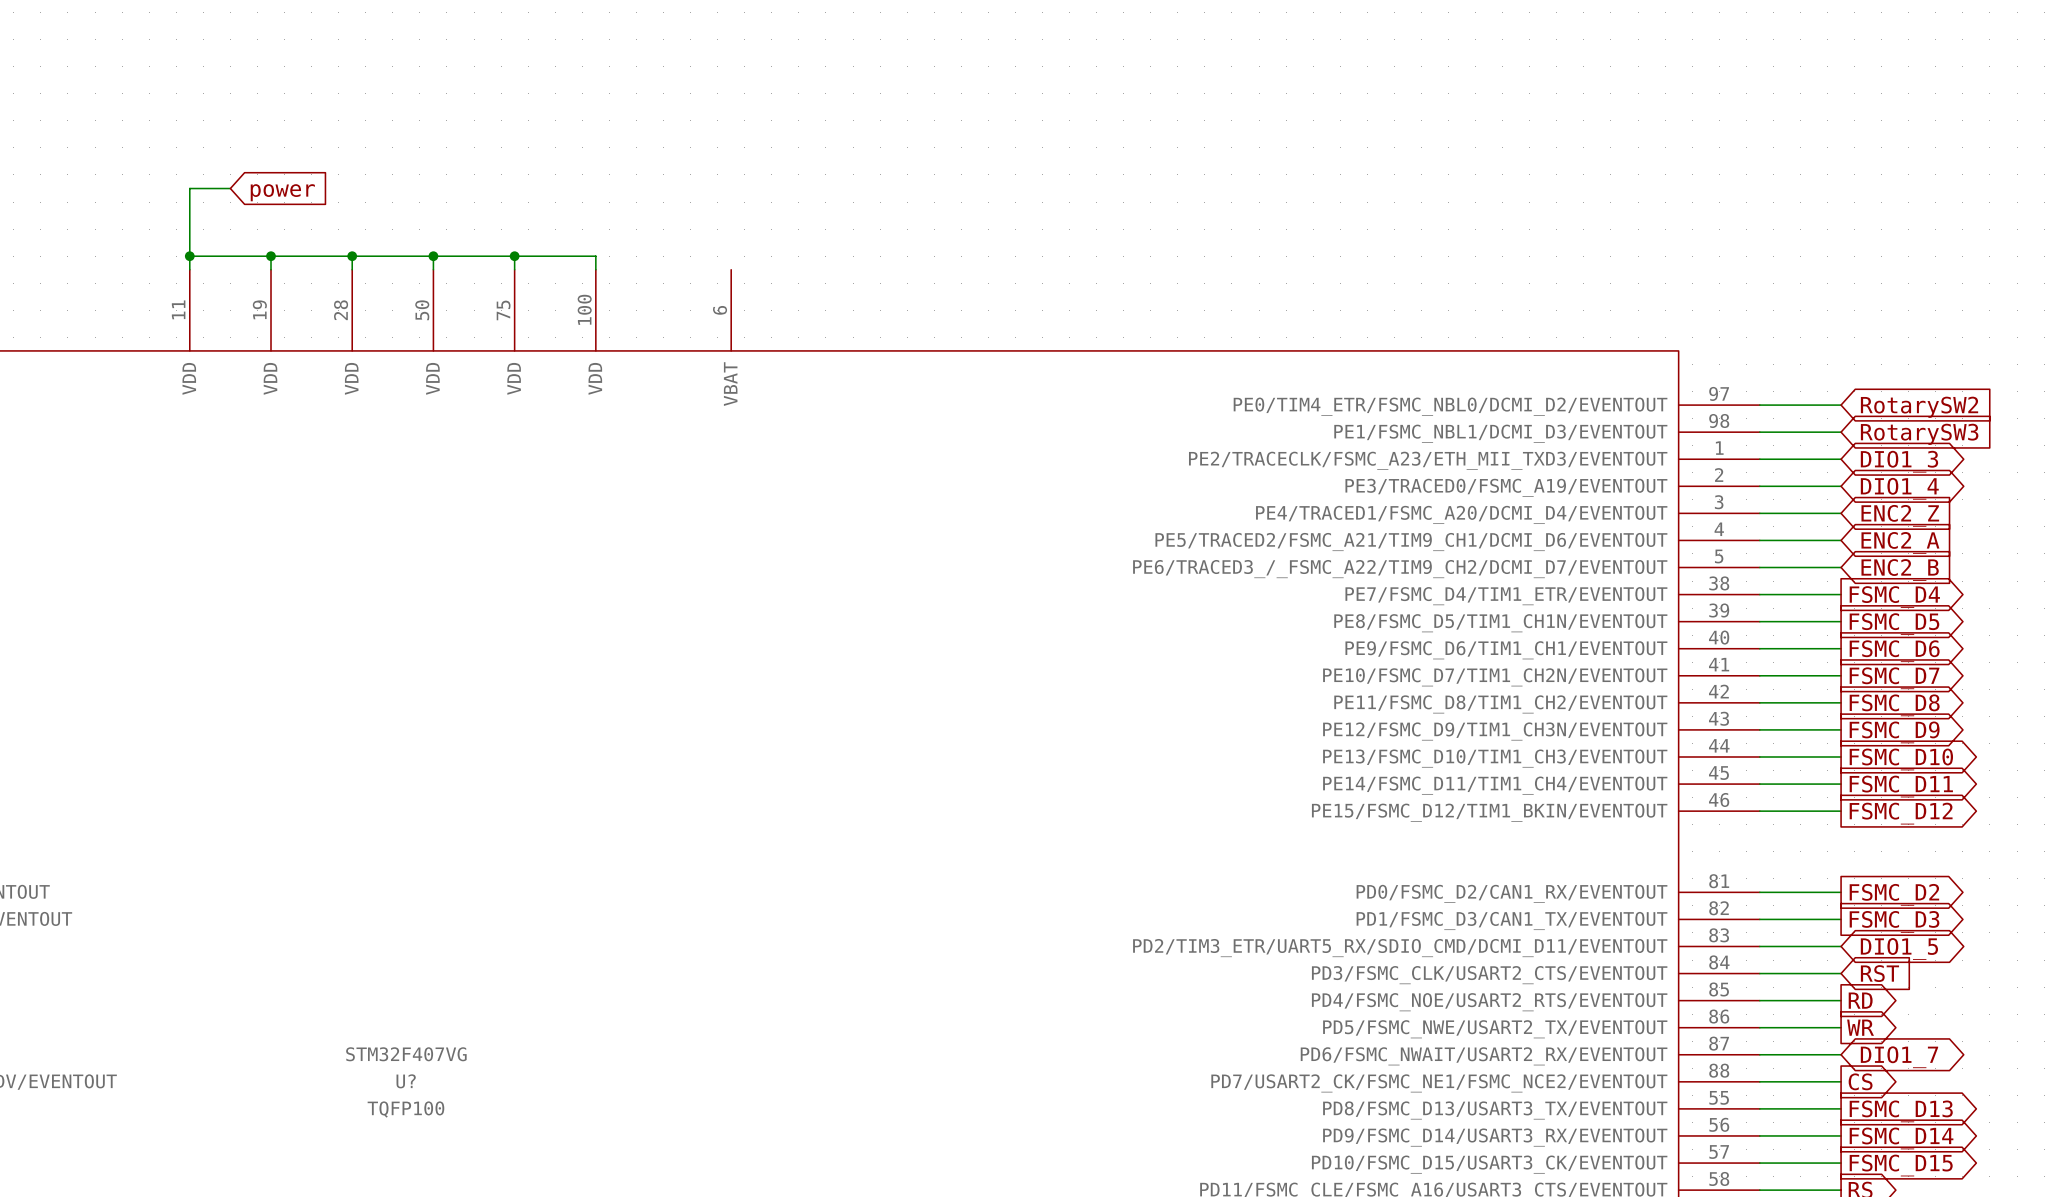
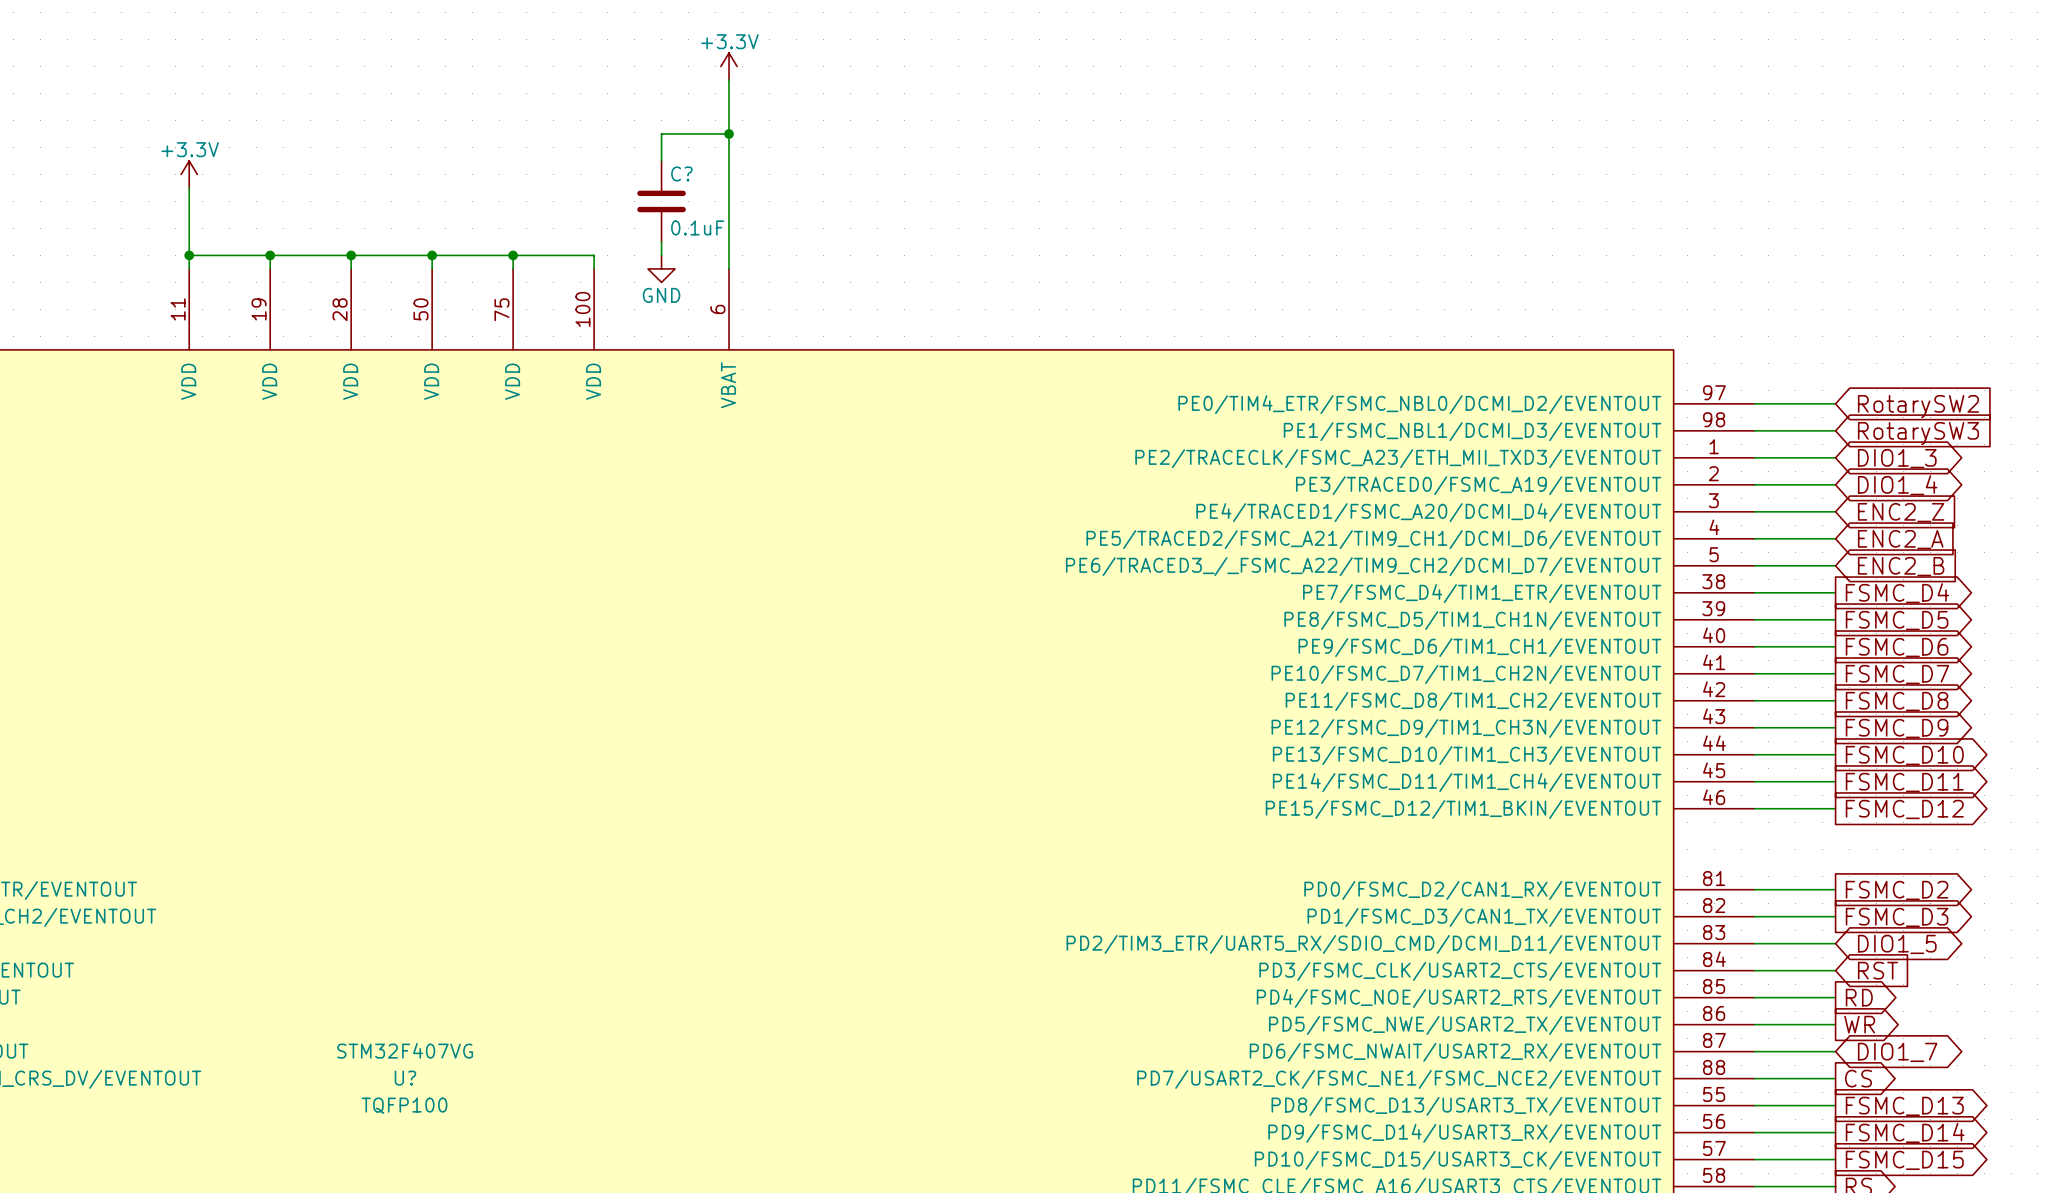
power symbol: none -> +3.3V (729, 66)
wire: none -> (729, 80) (729, 268)
wire: none -> (729, 133) (661, 133) (661, 160)
junction: none -> (729, 133)
power symbol: none -> +3.3V (189, 174)
wire: (189, 188) (230, 188) -> none
global label: power (282, 192) -> none
C?: none -> 0.1uF (661, 201)
wire: none -> (661, 241) (661, 255)
power symbol: none -> GND (661, 268)

